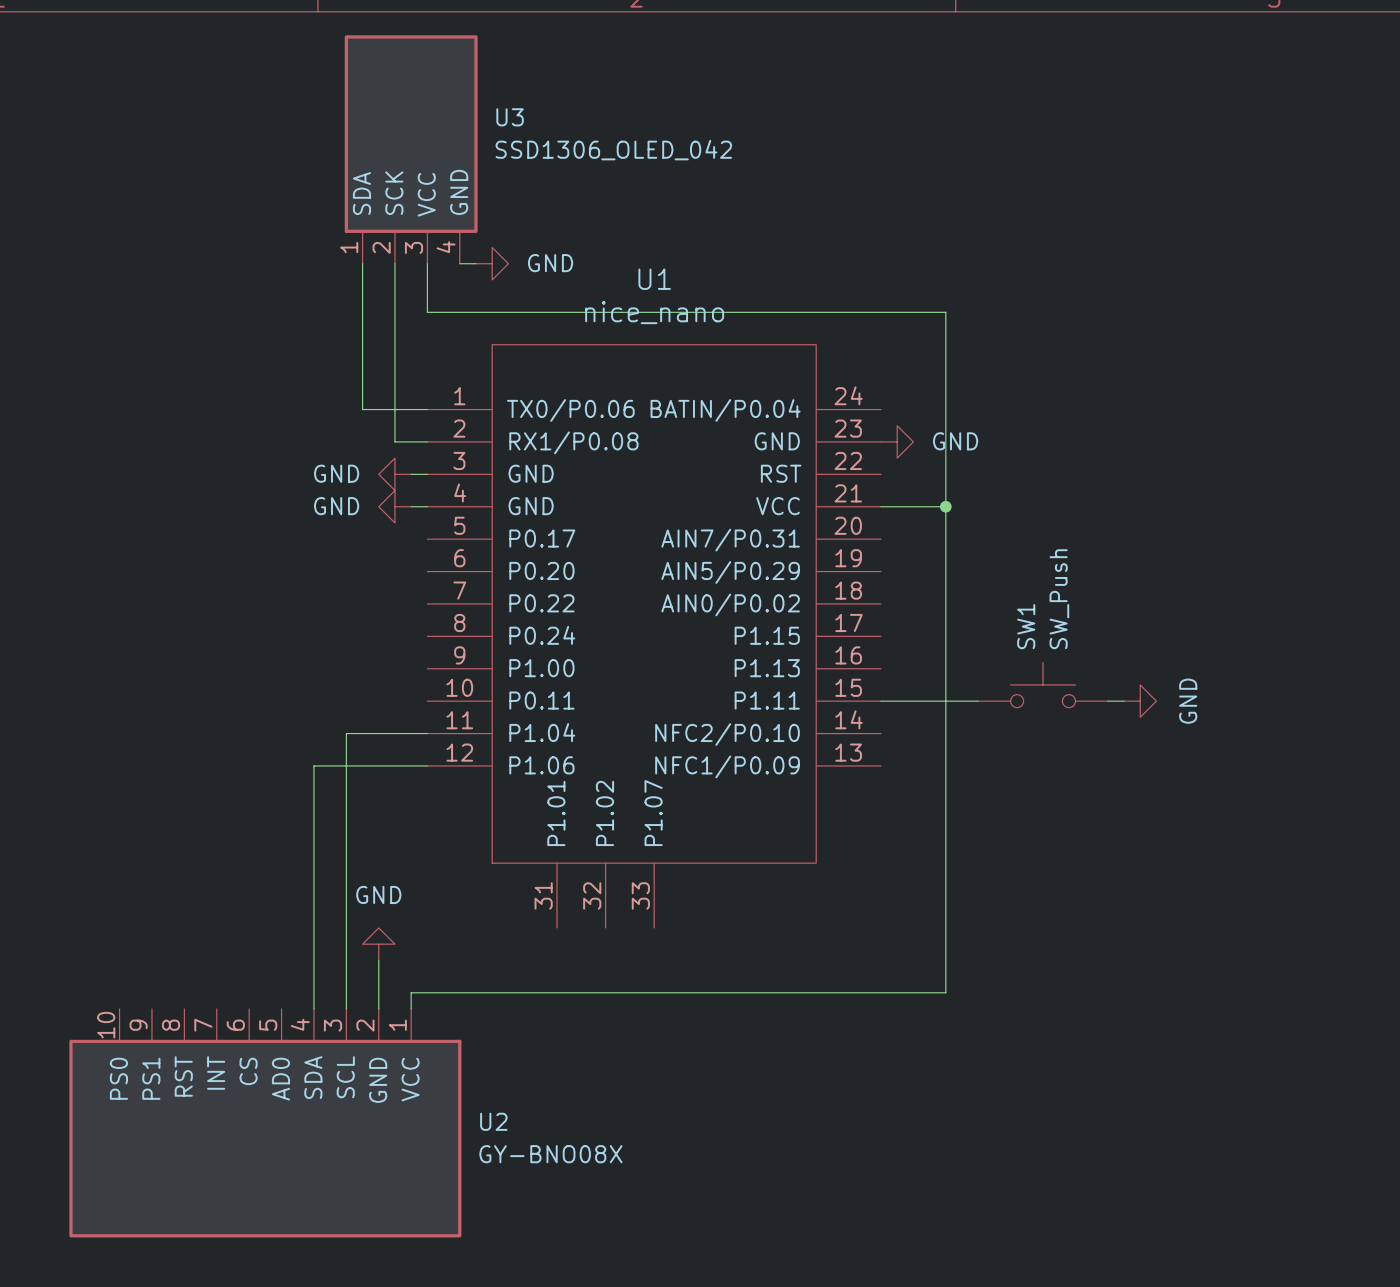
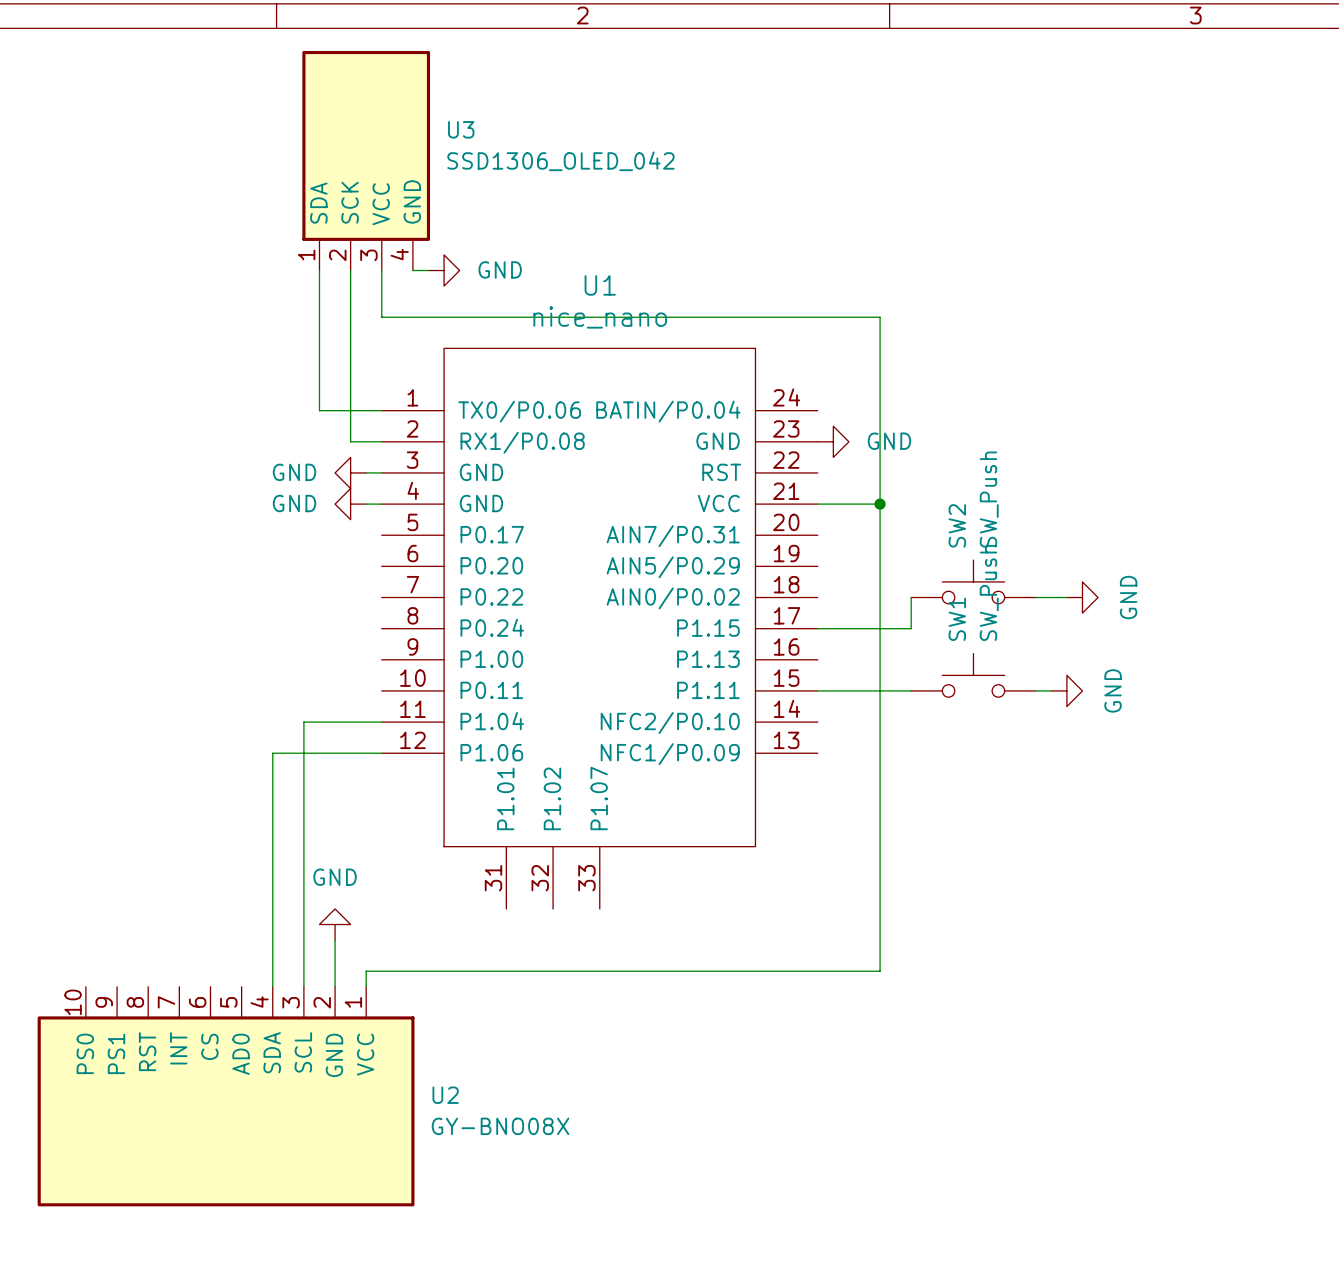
SW2: none -> SW_Push (973, 581)
wire: none -> (911, 597) (911, 628) (817, 628)
wire: none -> (1035, 597) (1066, 597)
power symbol: none -> GND (1082, 597)

